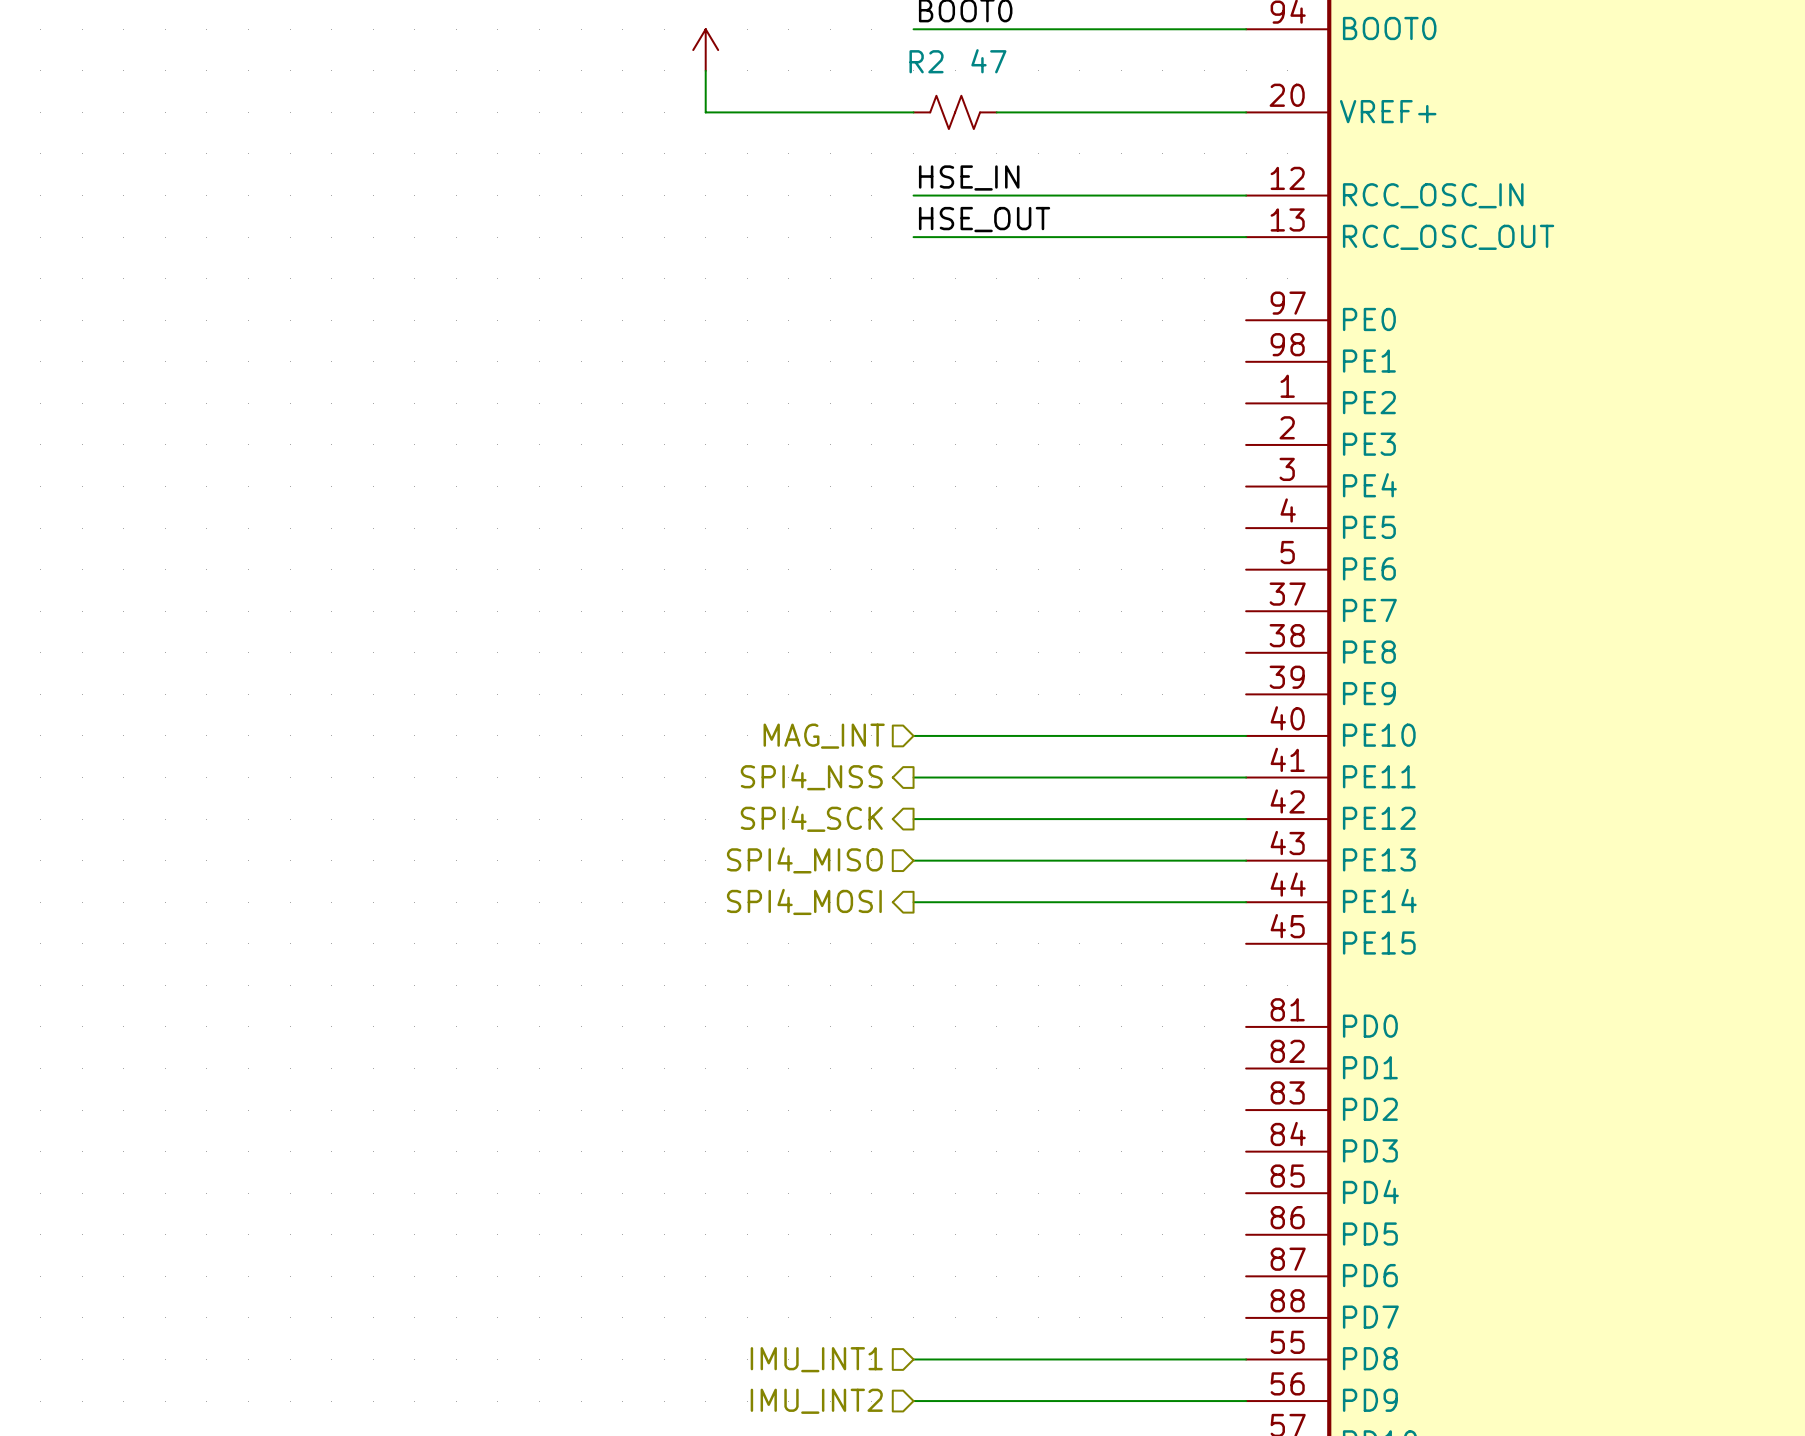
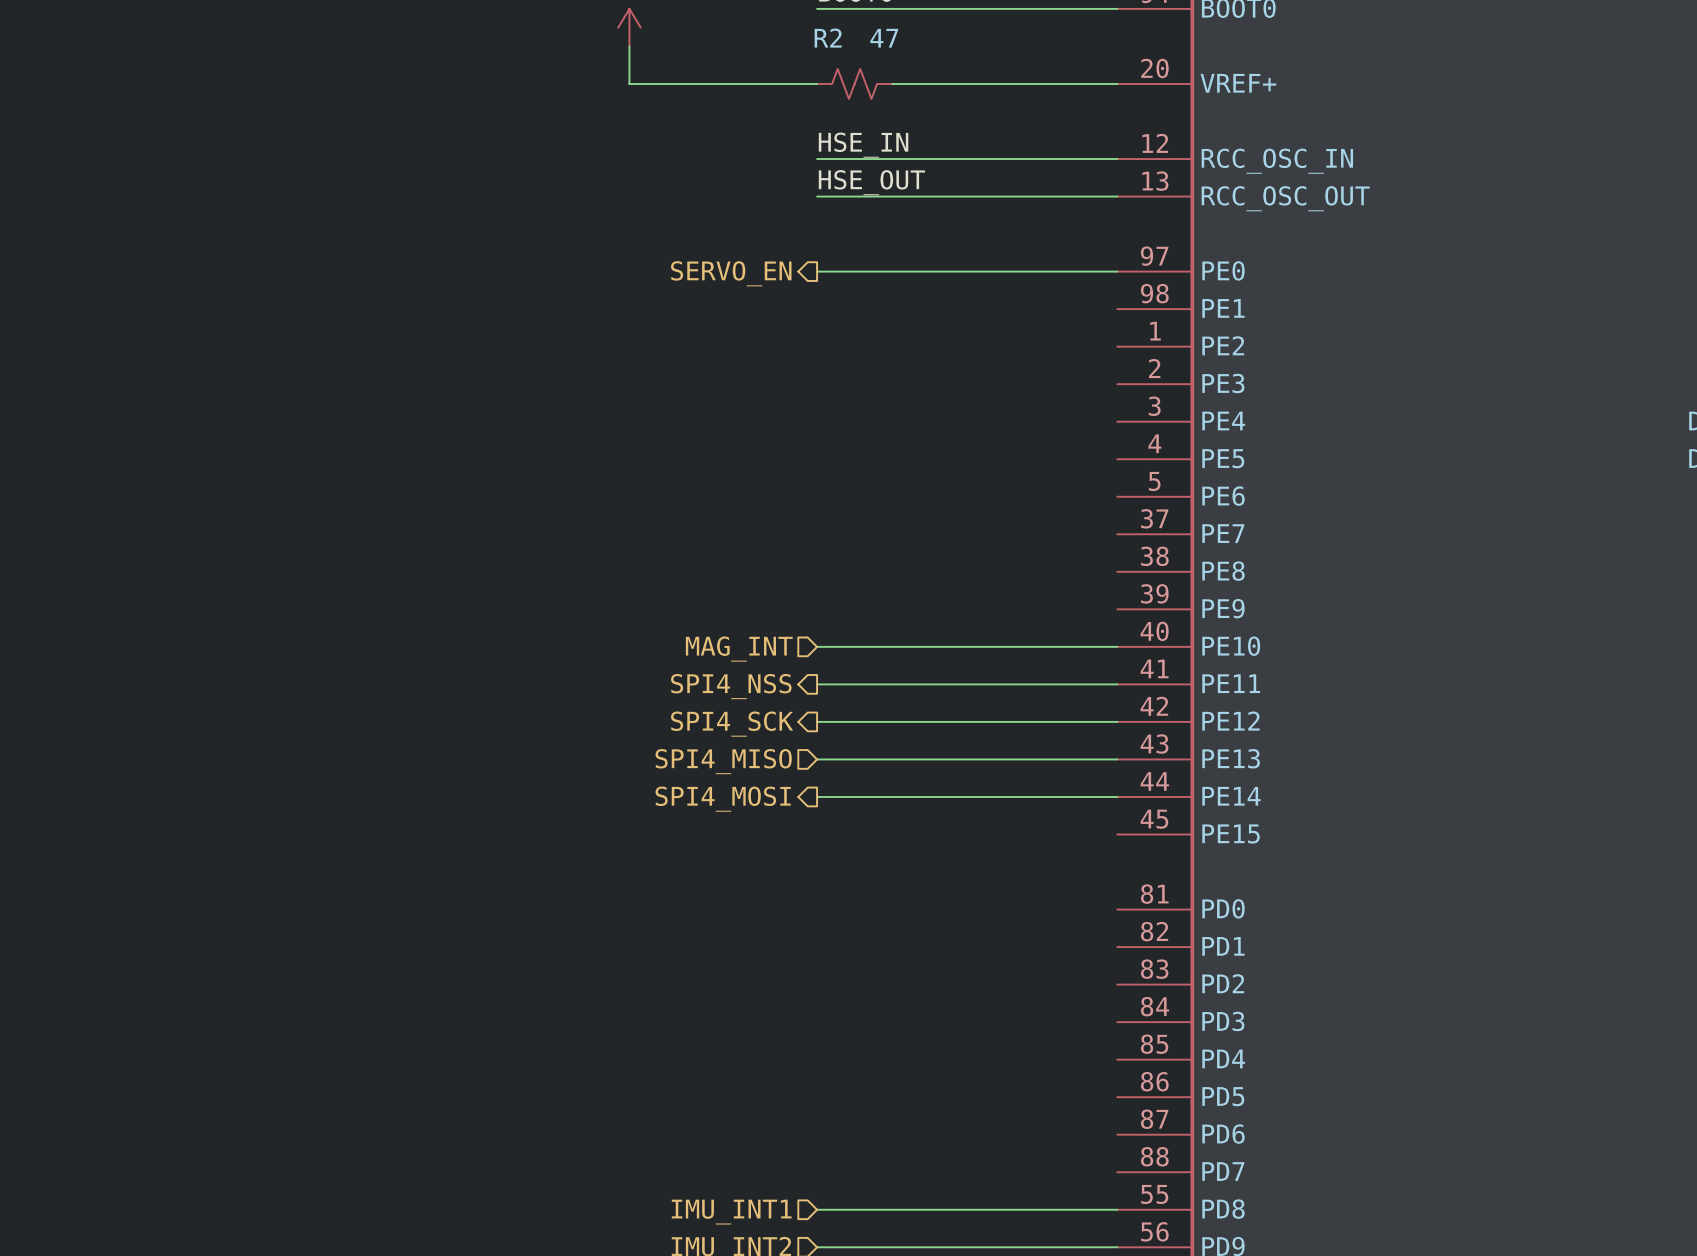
hierarchical label: none -> SERVO_EN (731, 273)
wire: none -> (817, 271) (1117, 271)

